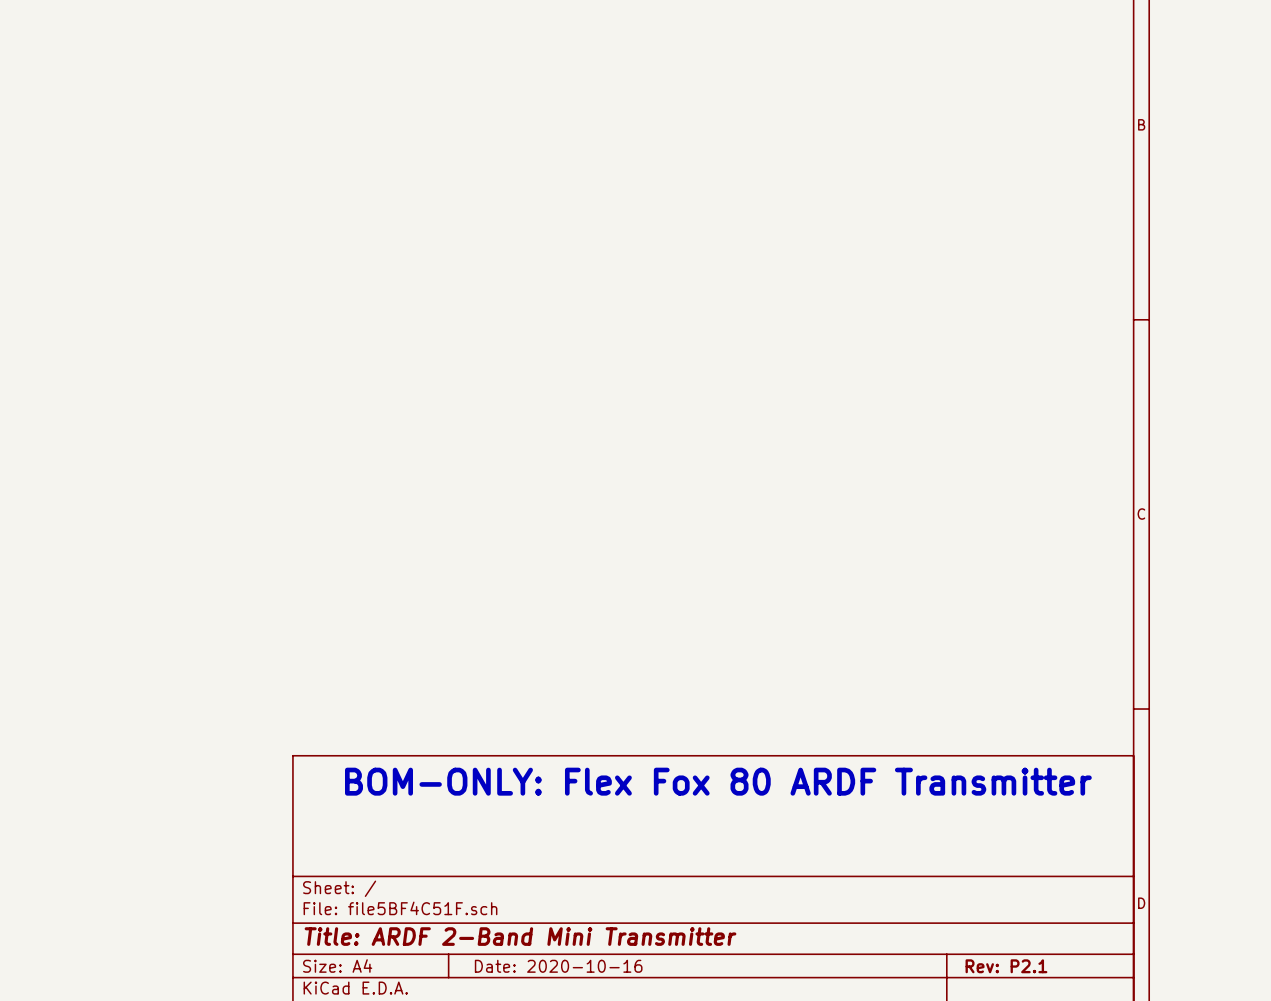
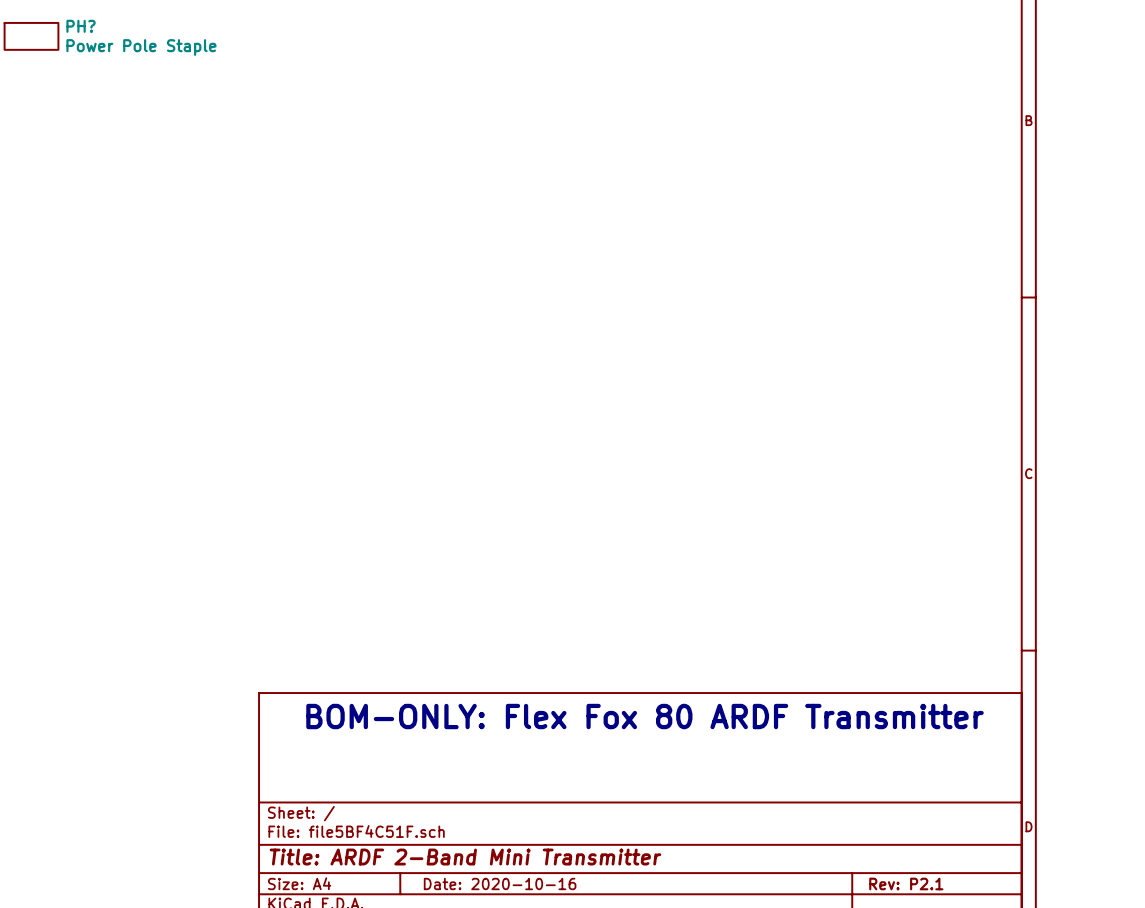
PH?: none -> Power Pole Staple (31, 36)

